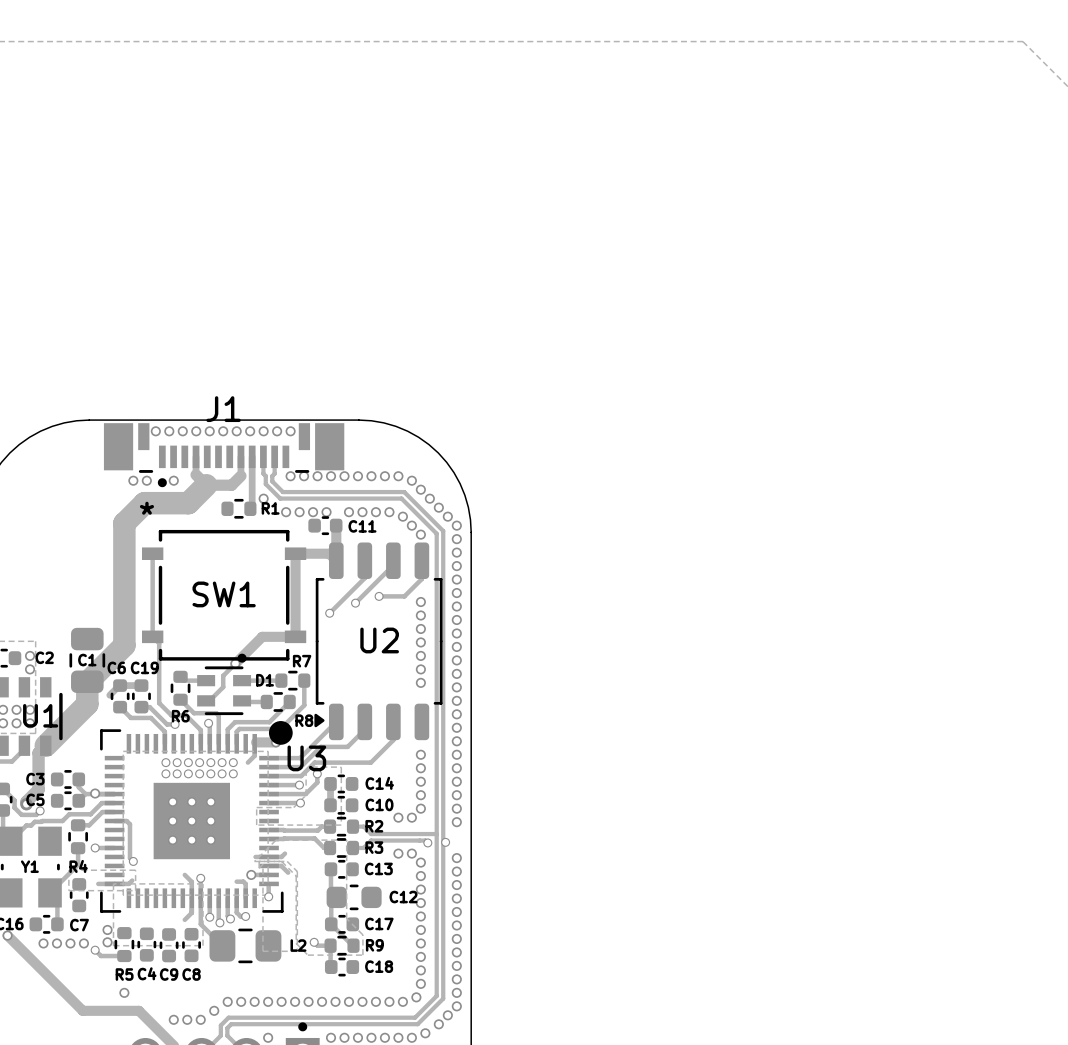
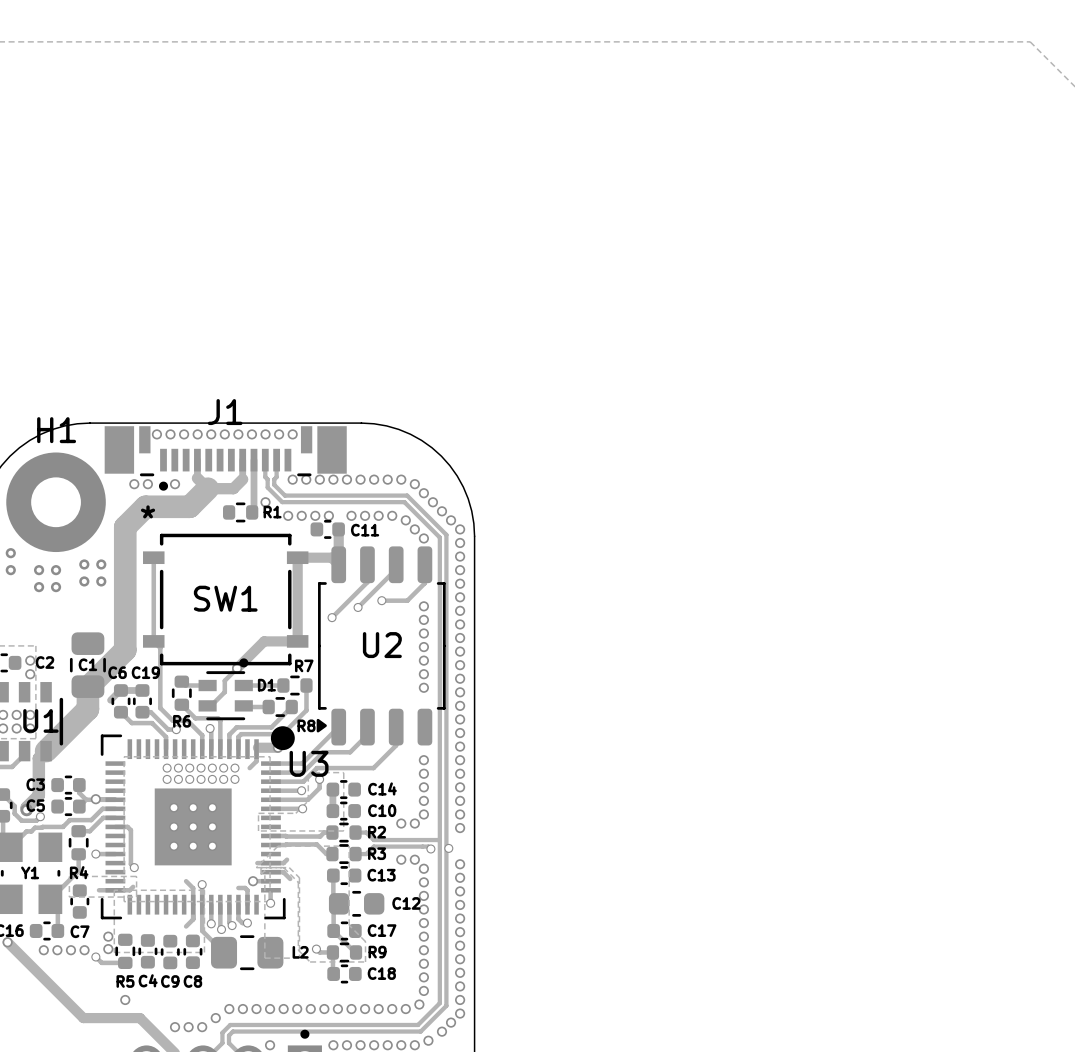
H1: none -> (56, 502)
via: none -> (10, 553)
via: none -> (84, 564)
via: none -> (101, 564)
via: none -> (10, 570)
via: none -> (39, 570)
via: none -> (56, 570)
via: none -> (84, 581)
via: none -> (101, 581)
via: none -> (39, 587)
via: none -> (56, 587)

